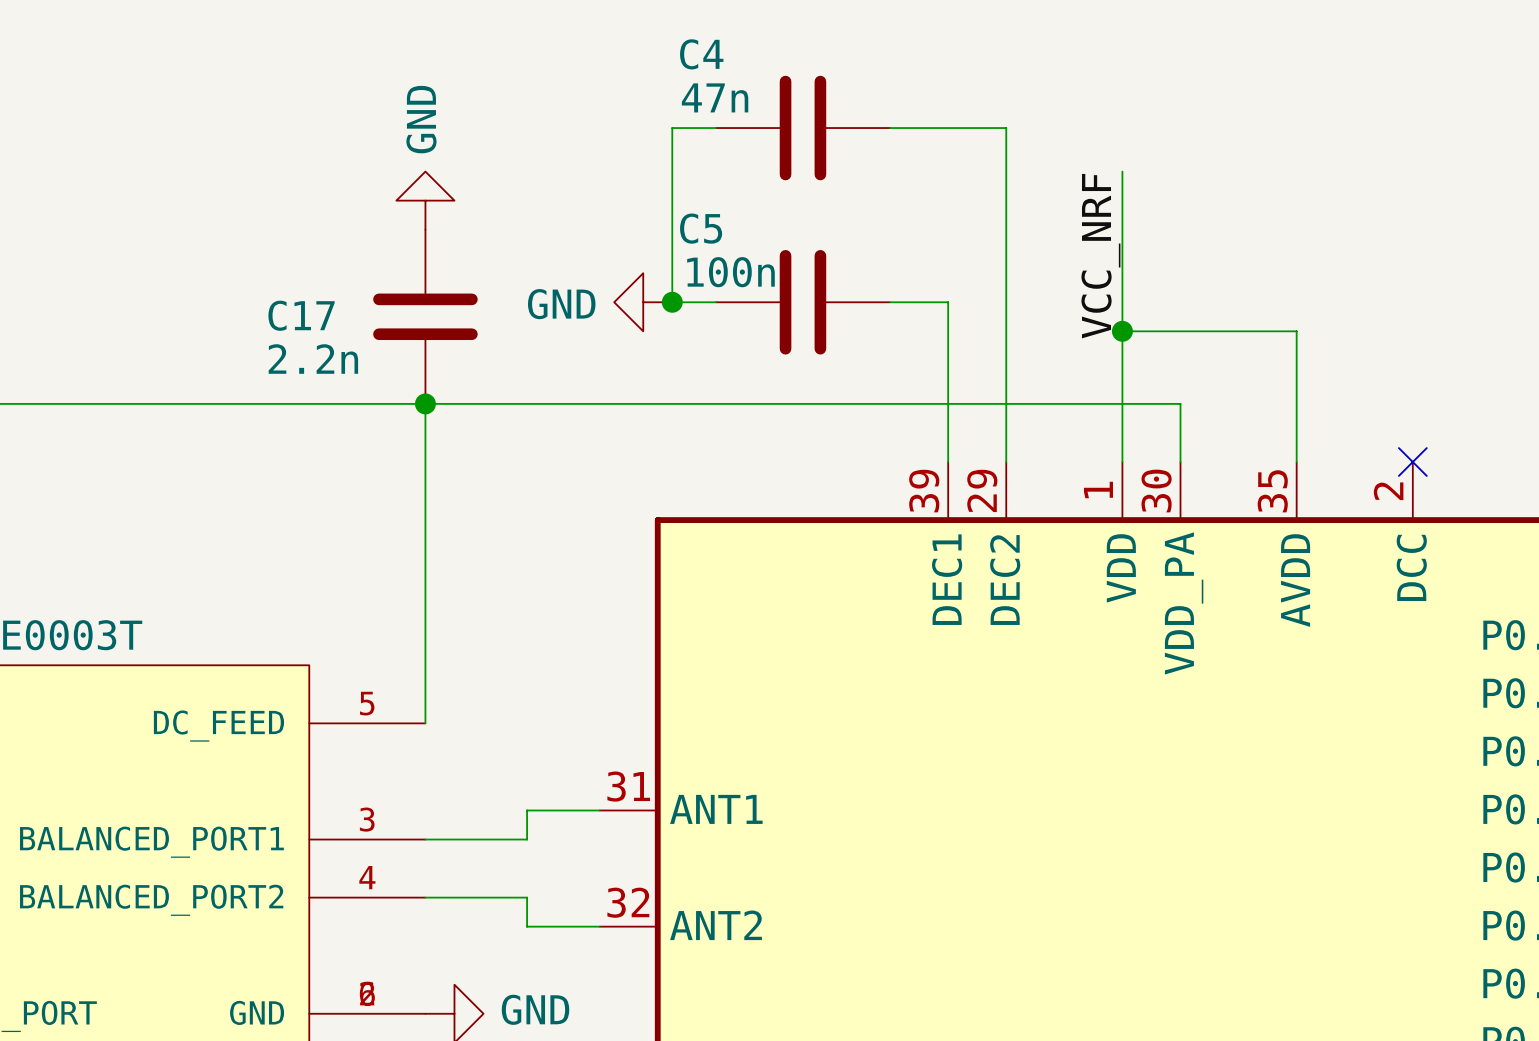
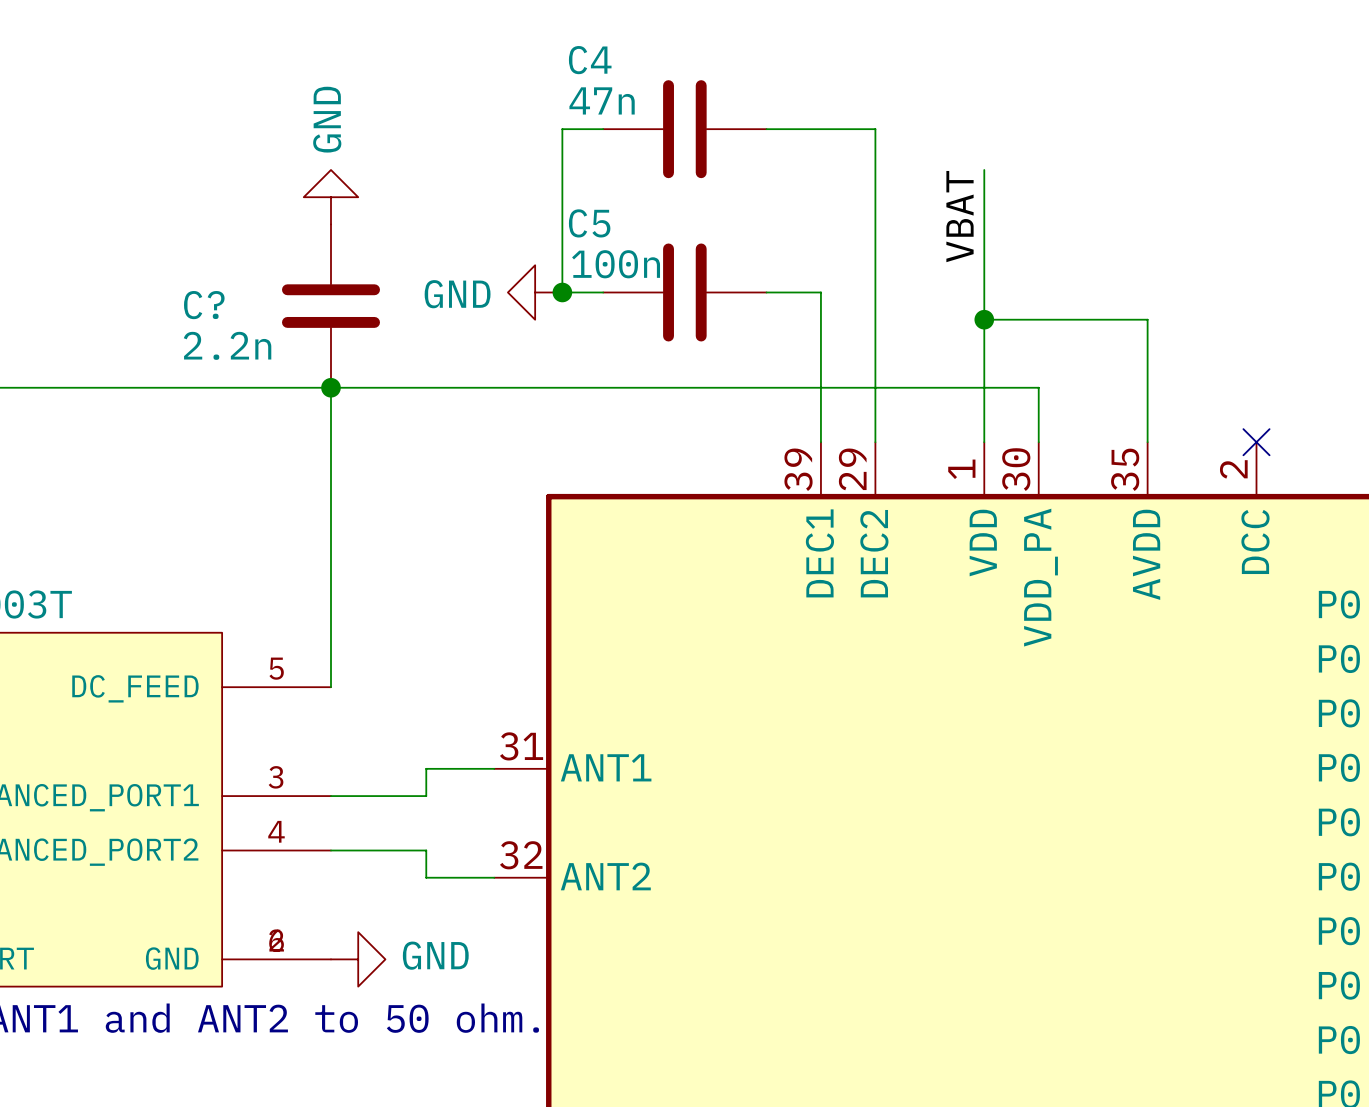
label: VCC_NRF (1100, 256) -> VBAT (960, 216)
C17 name: C17 (301, 315) -> C? (204, 305)

